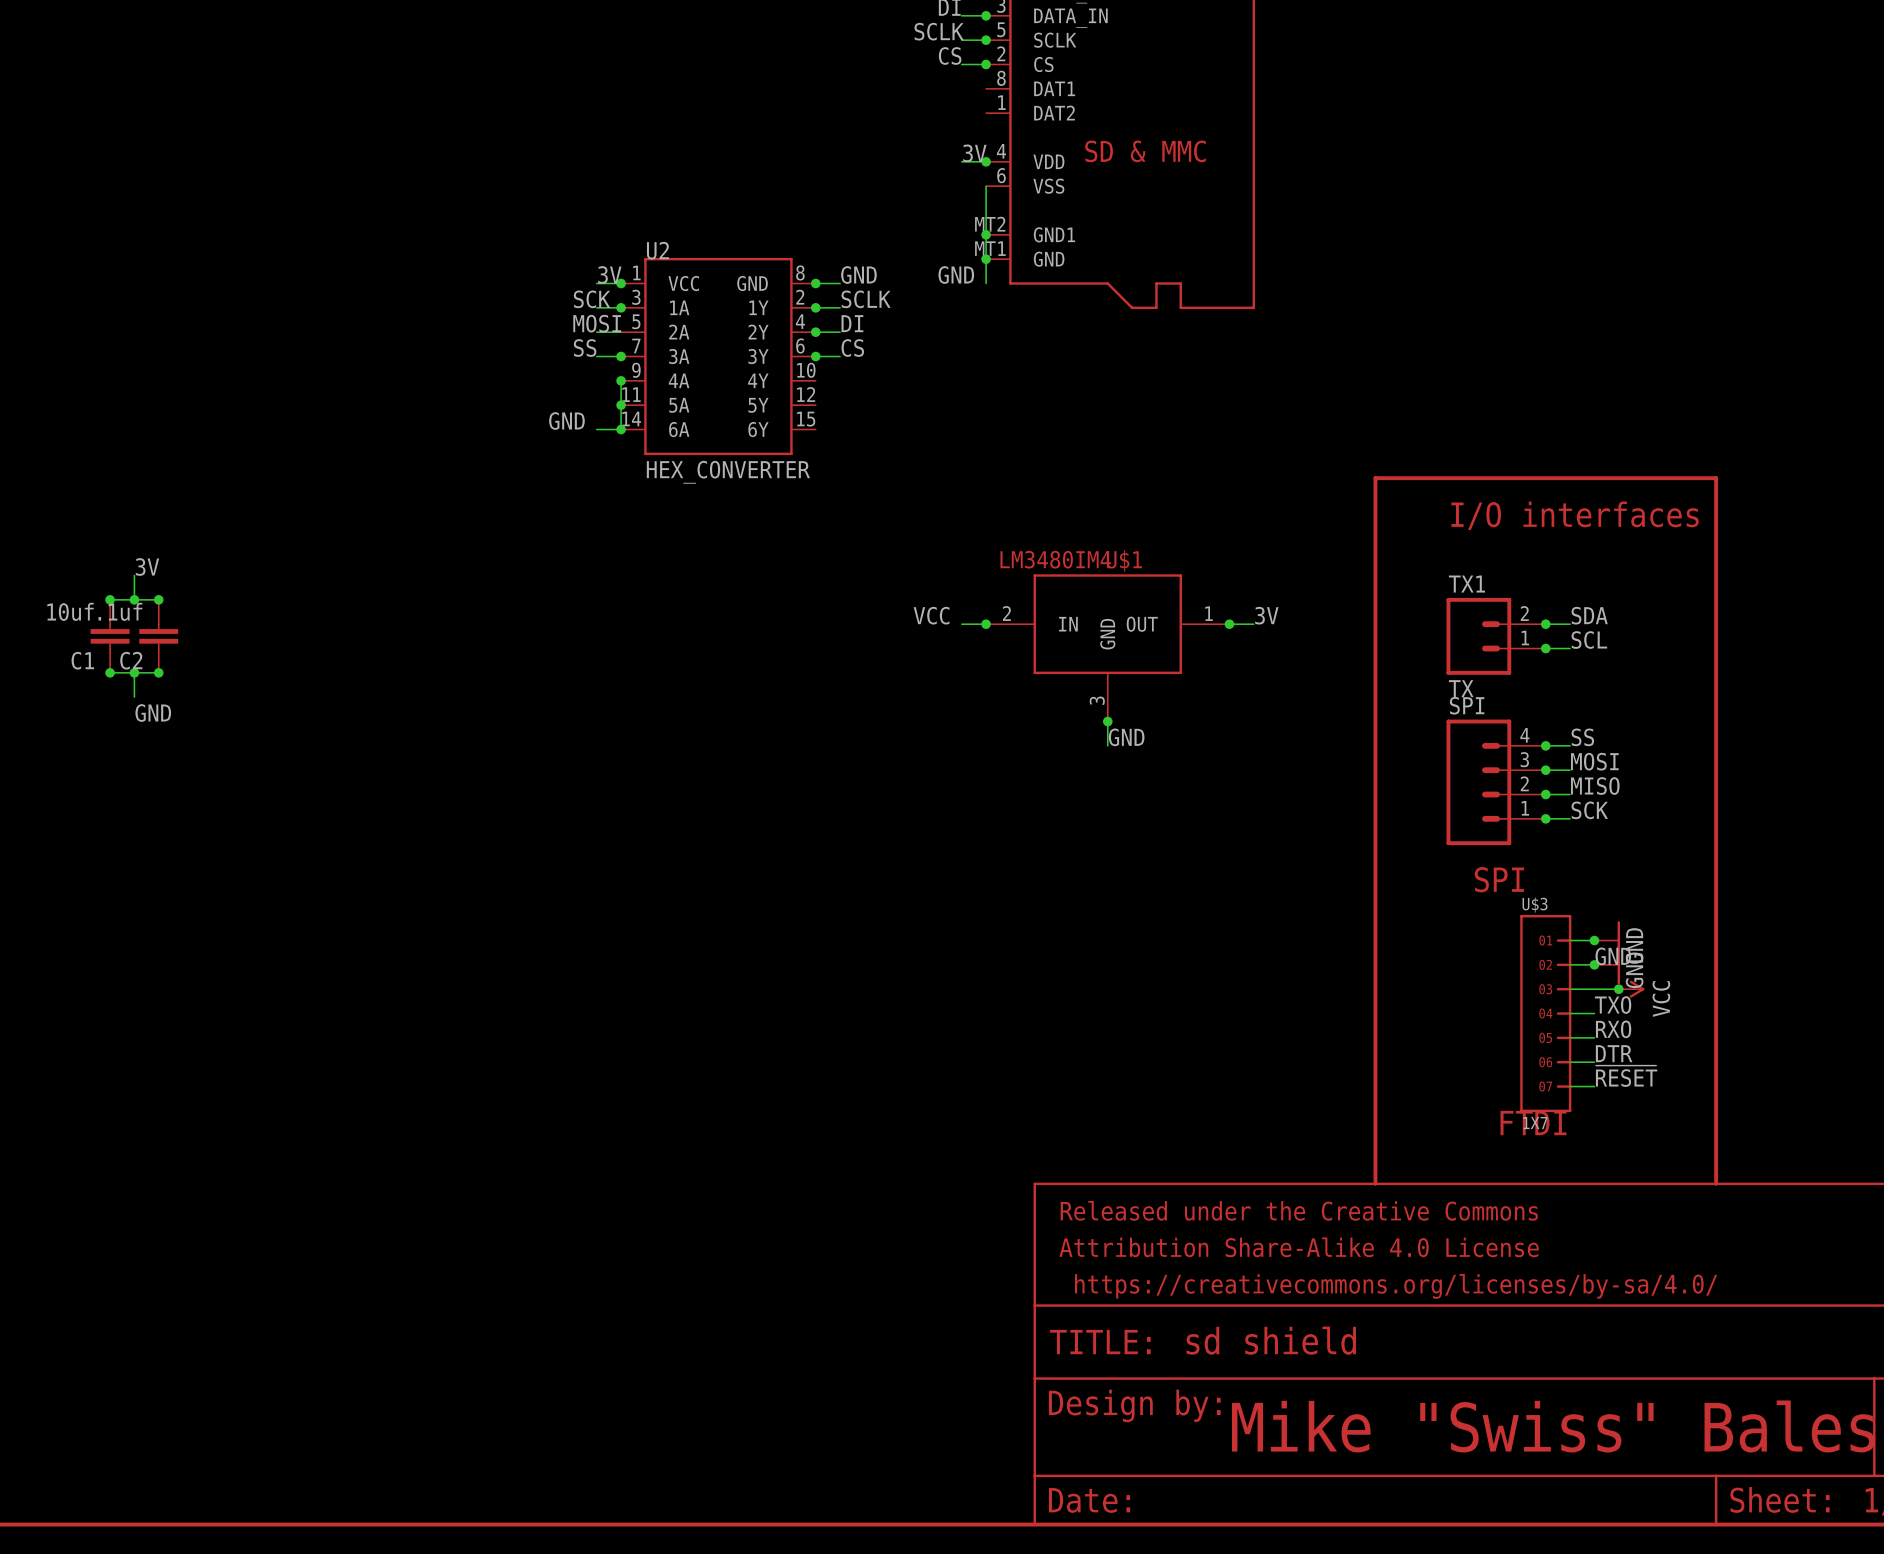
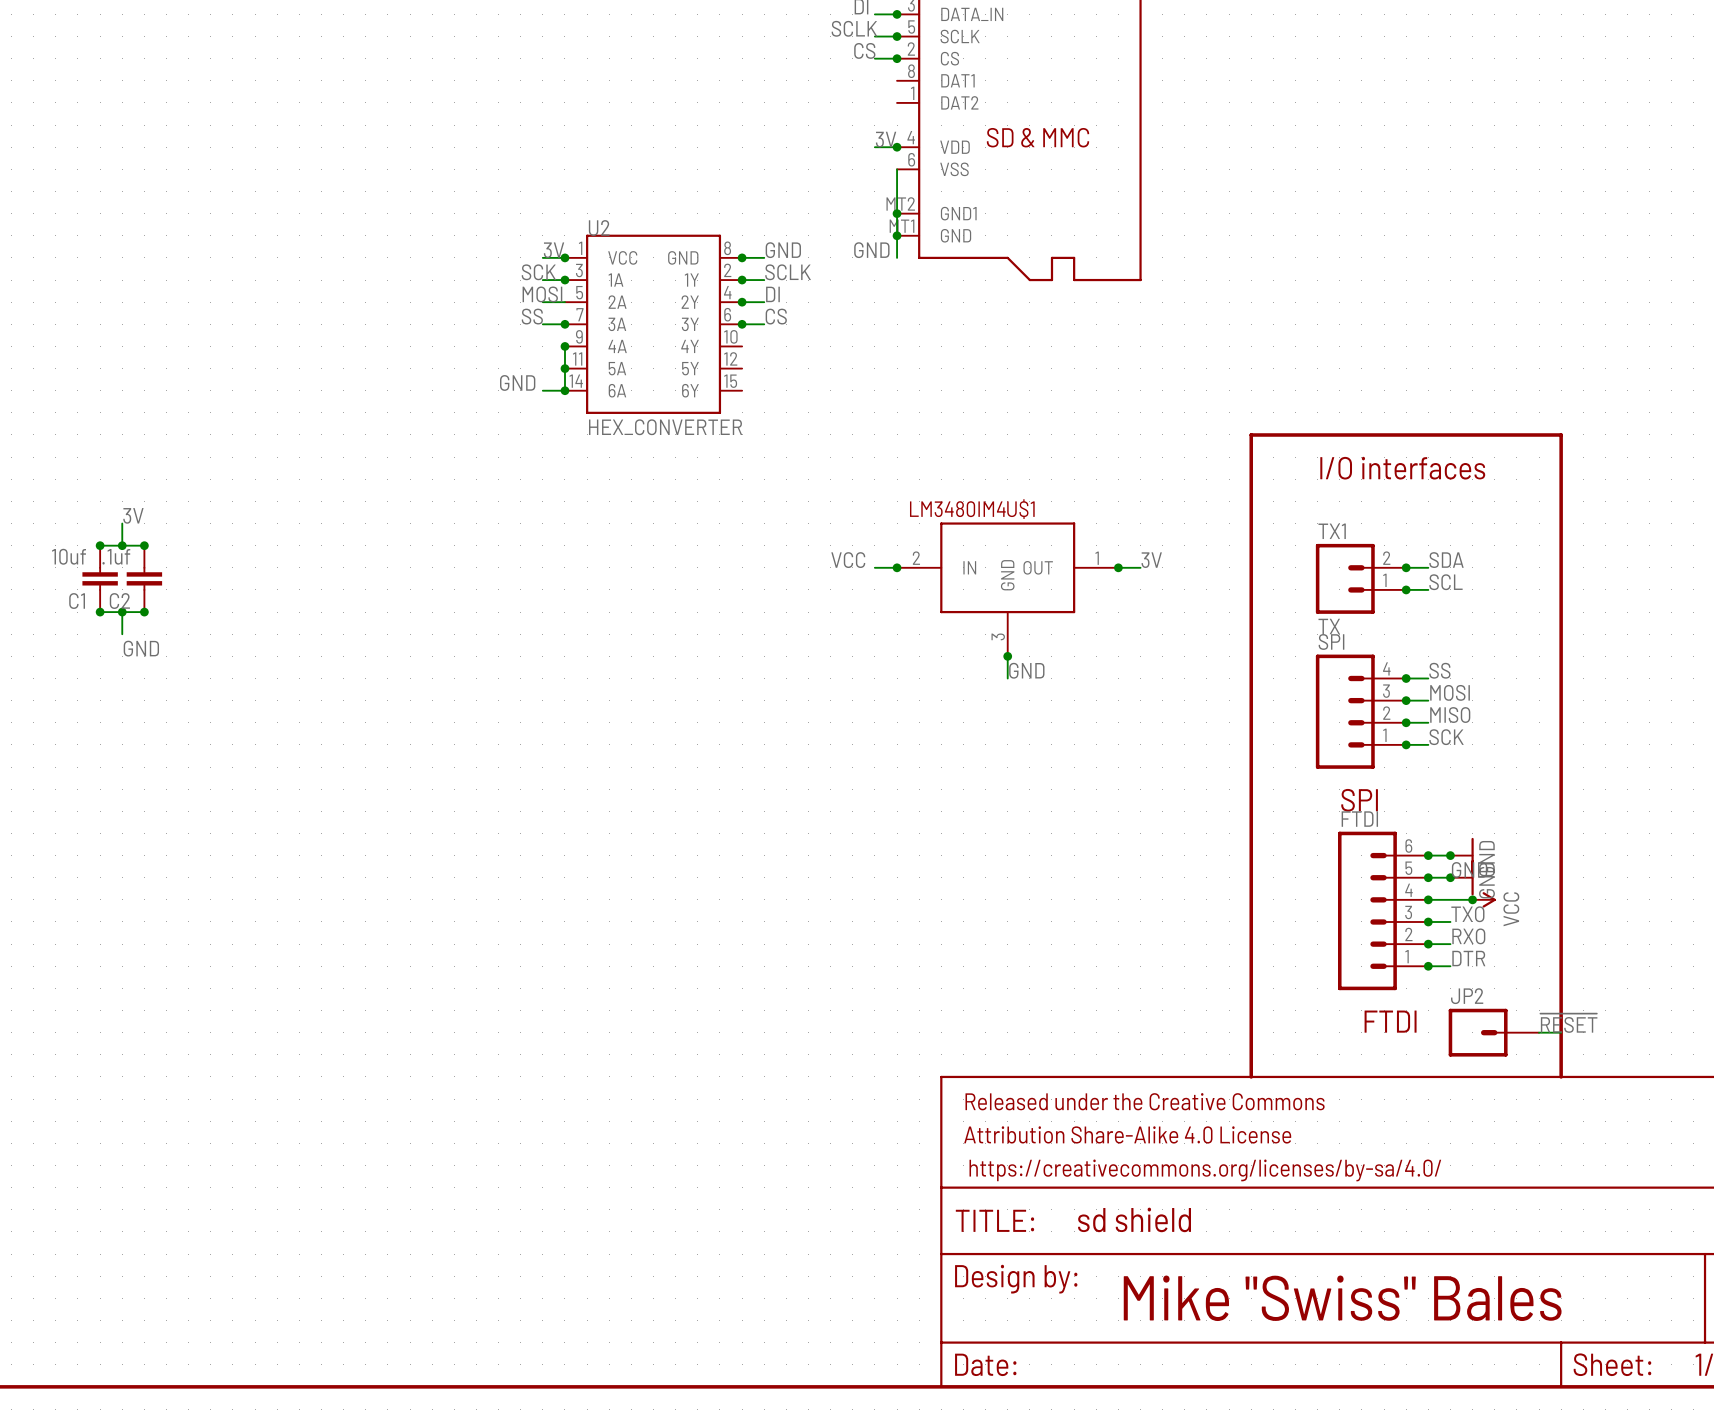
junction: none -> (1428, 855)
junction: none -> (1428, 877)
junction: none -> (1428, 899)
FTDI: none -> (1383, 910)
U$3: 1X7 (1545, 1013) -> none
junction: none -> (1428, 921)
junction: none -> (1428, 944)
junction: none -> (1428, 966)
label position: ~{RESET} (1626, 1076) -> ~{RESET} (1568, 1023)
wire: (1570, 1086) (1594, 1086) -> (1539, 1032) (1561, 1032)
JP2: none -> (1493, 1032)

